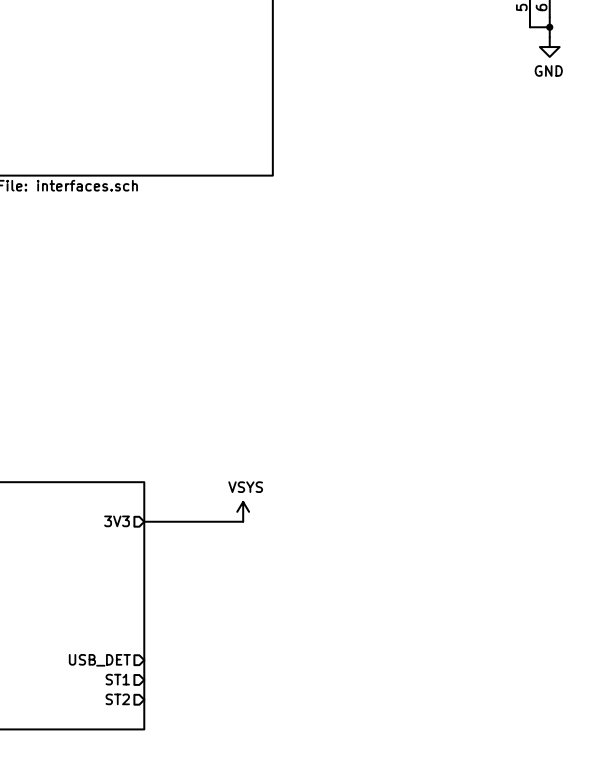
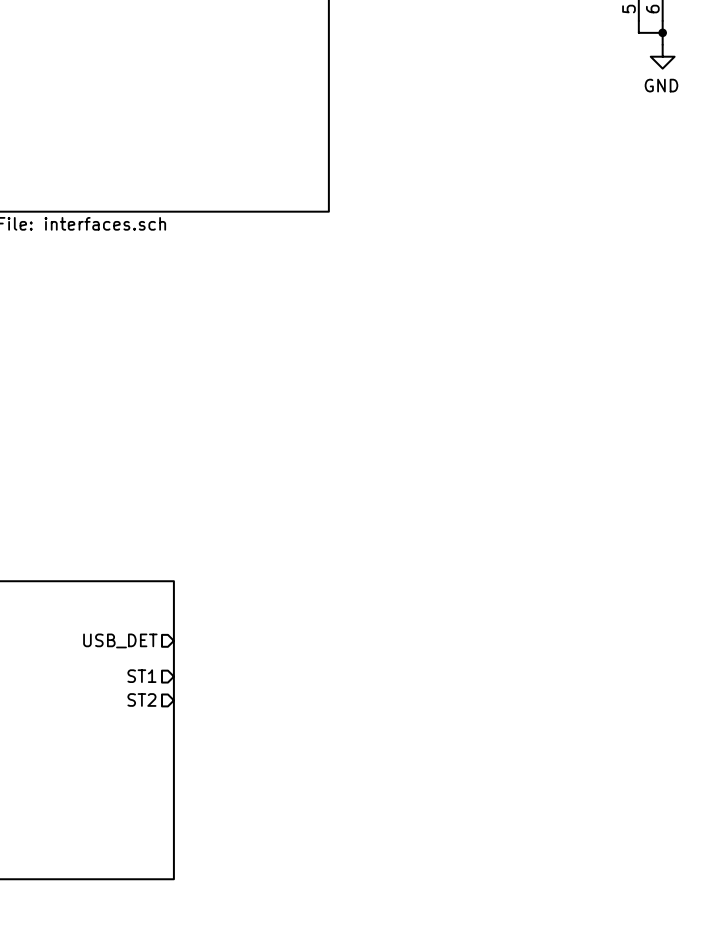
power symbol: VSYS (243, 511) -> none
sheet pin: 3V3 (117, 521) -> none
wire: (144, 521) (243, 521) -> none
sheet pin position: USB_DET (99, 660) -> USB_DET (120, 640)
sheet pin position: ST1 (117, 679) -> ST1 (141, 676)
sheet pin position: ST2 (117, 699) -> ST2 (141, 699)

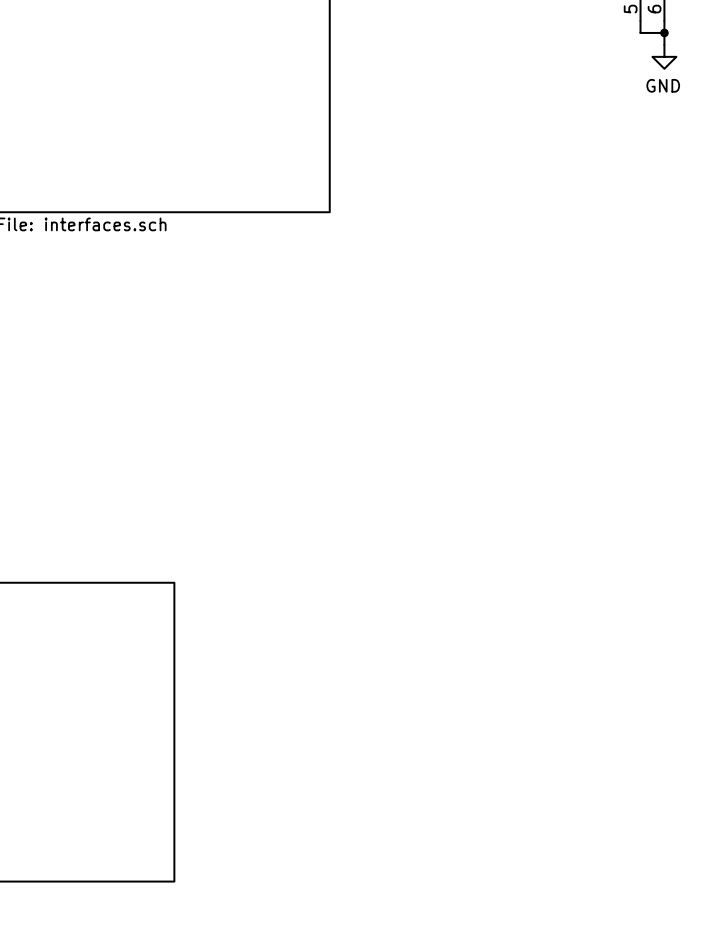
sheet pin: USB_DET (120, 640) -> none
sheet pin: ST1 (141, 676) -> none
sheet pin: ST2 (141, 699) -> none

